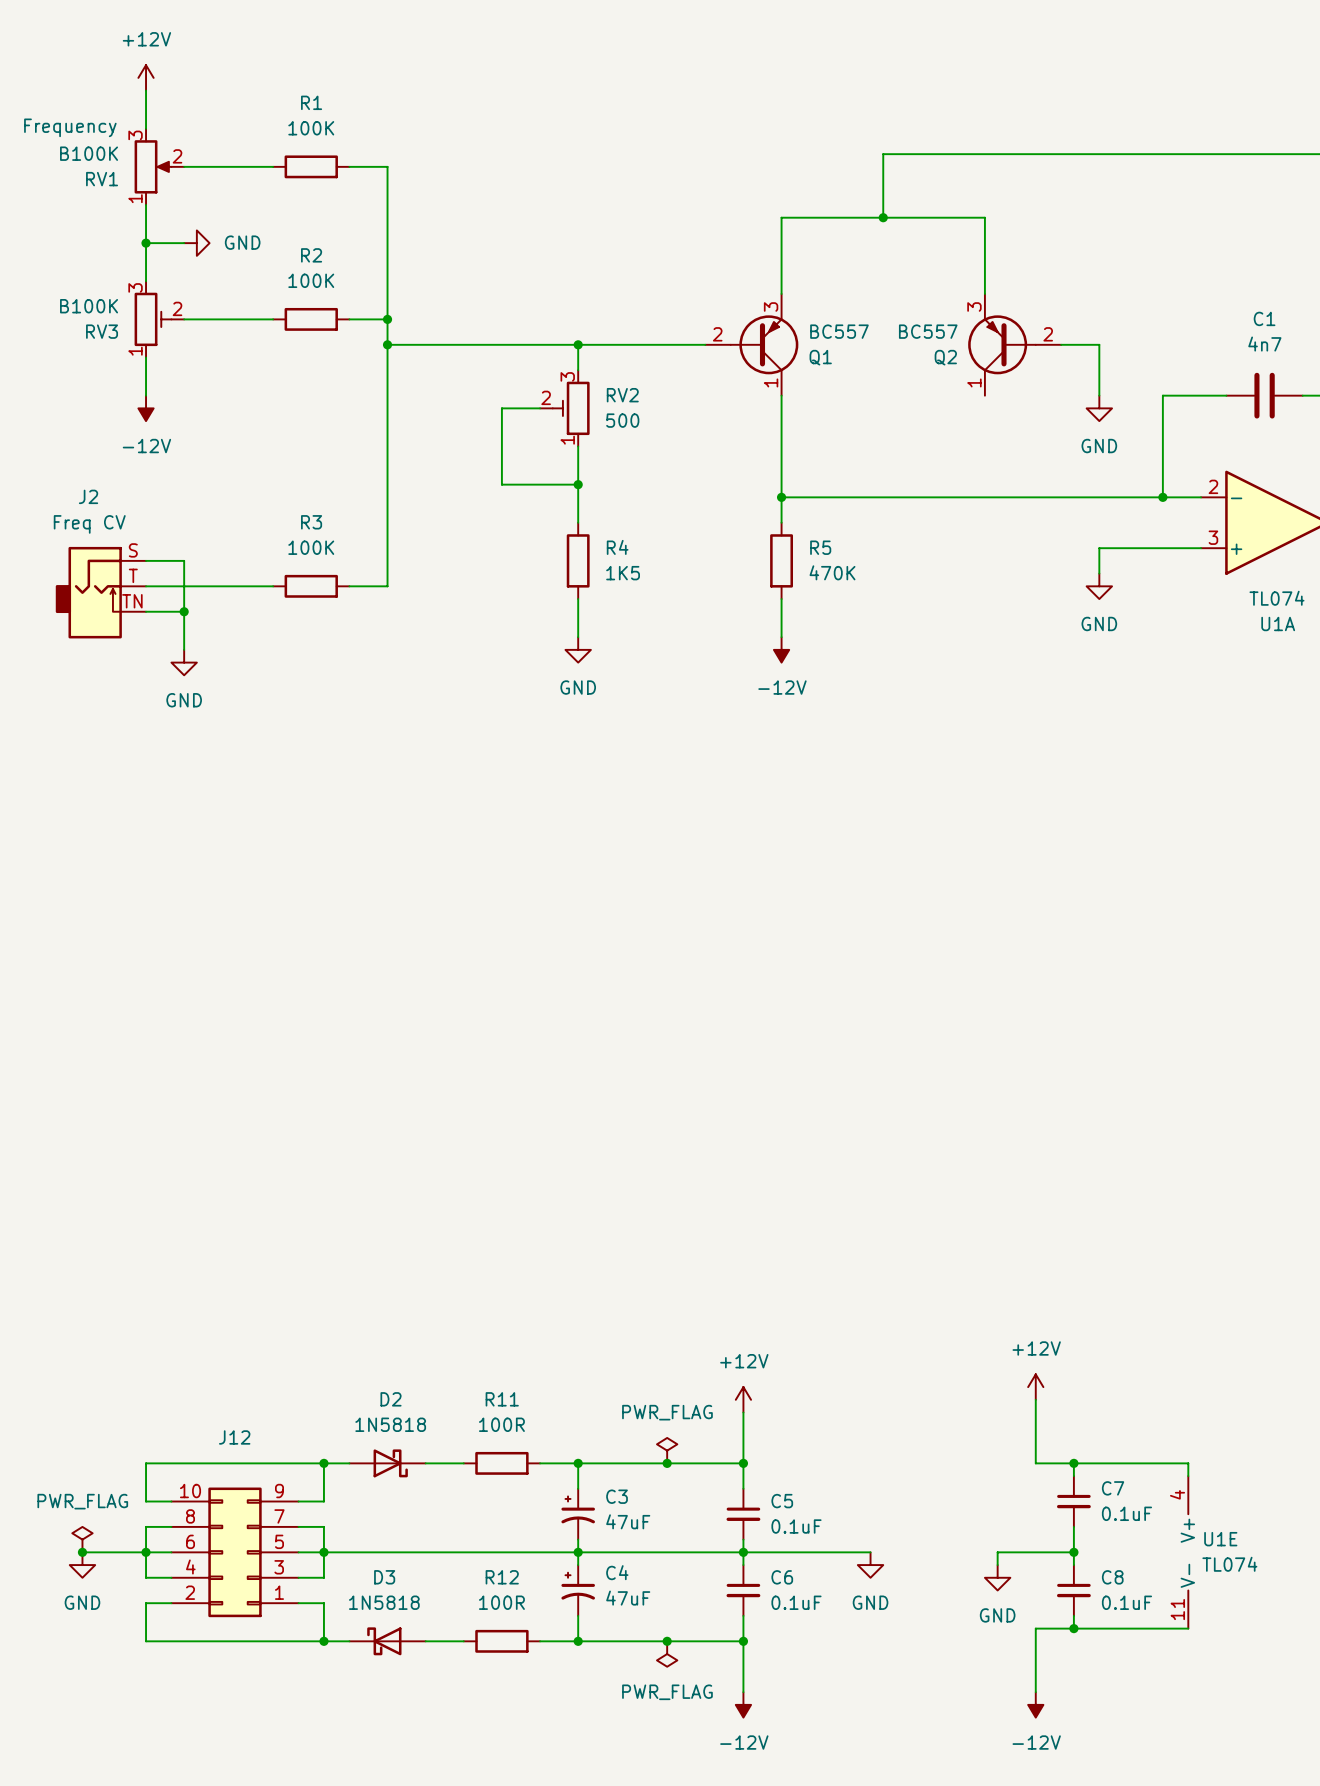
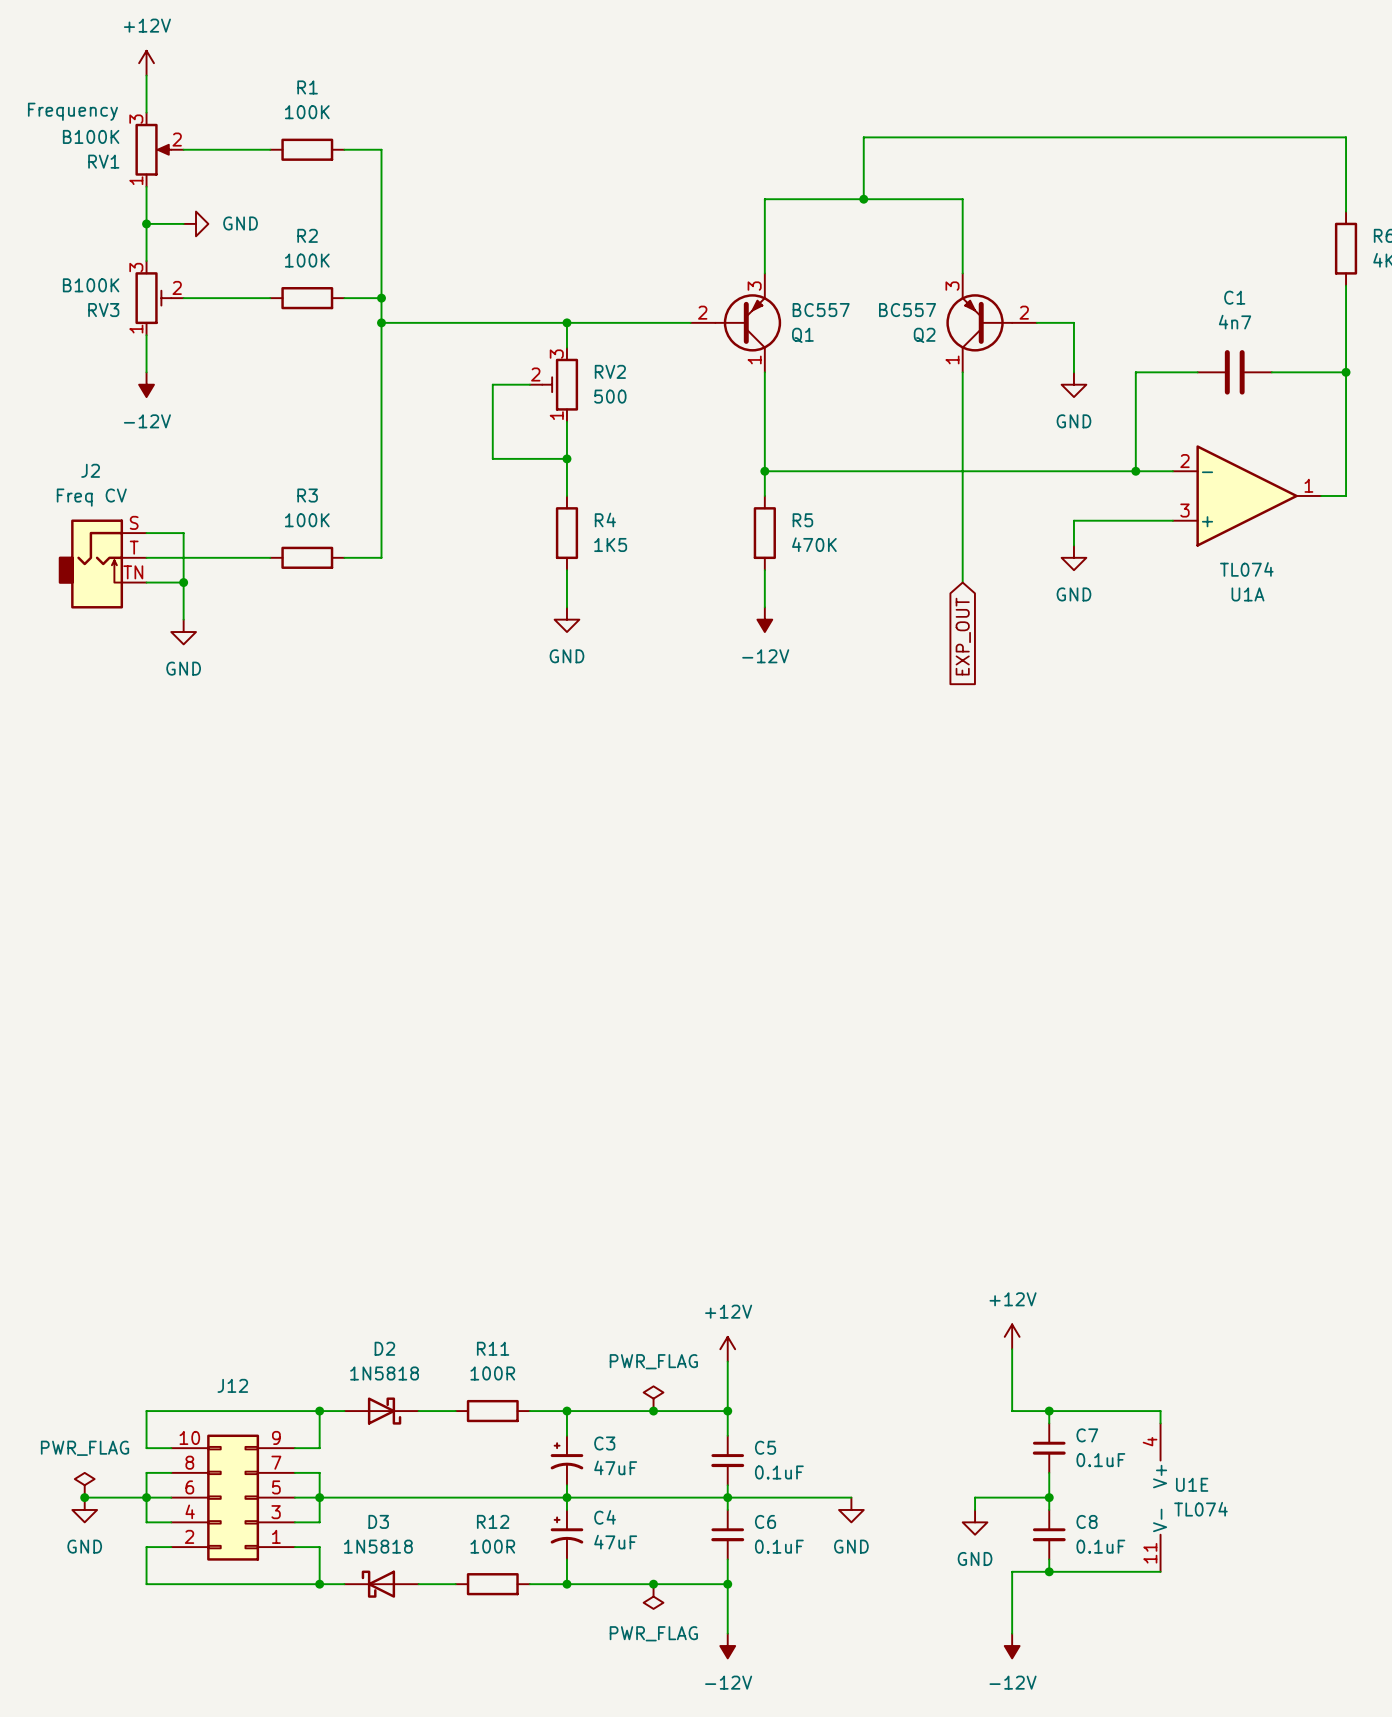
wire: none -> (962, 372) (962, 582)
global label: none -> EXP_OUT (963, 636)

